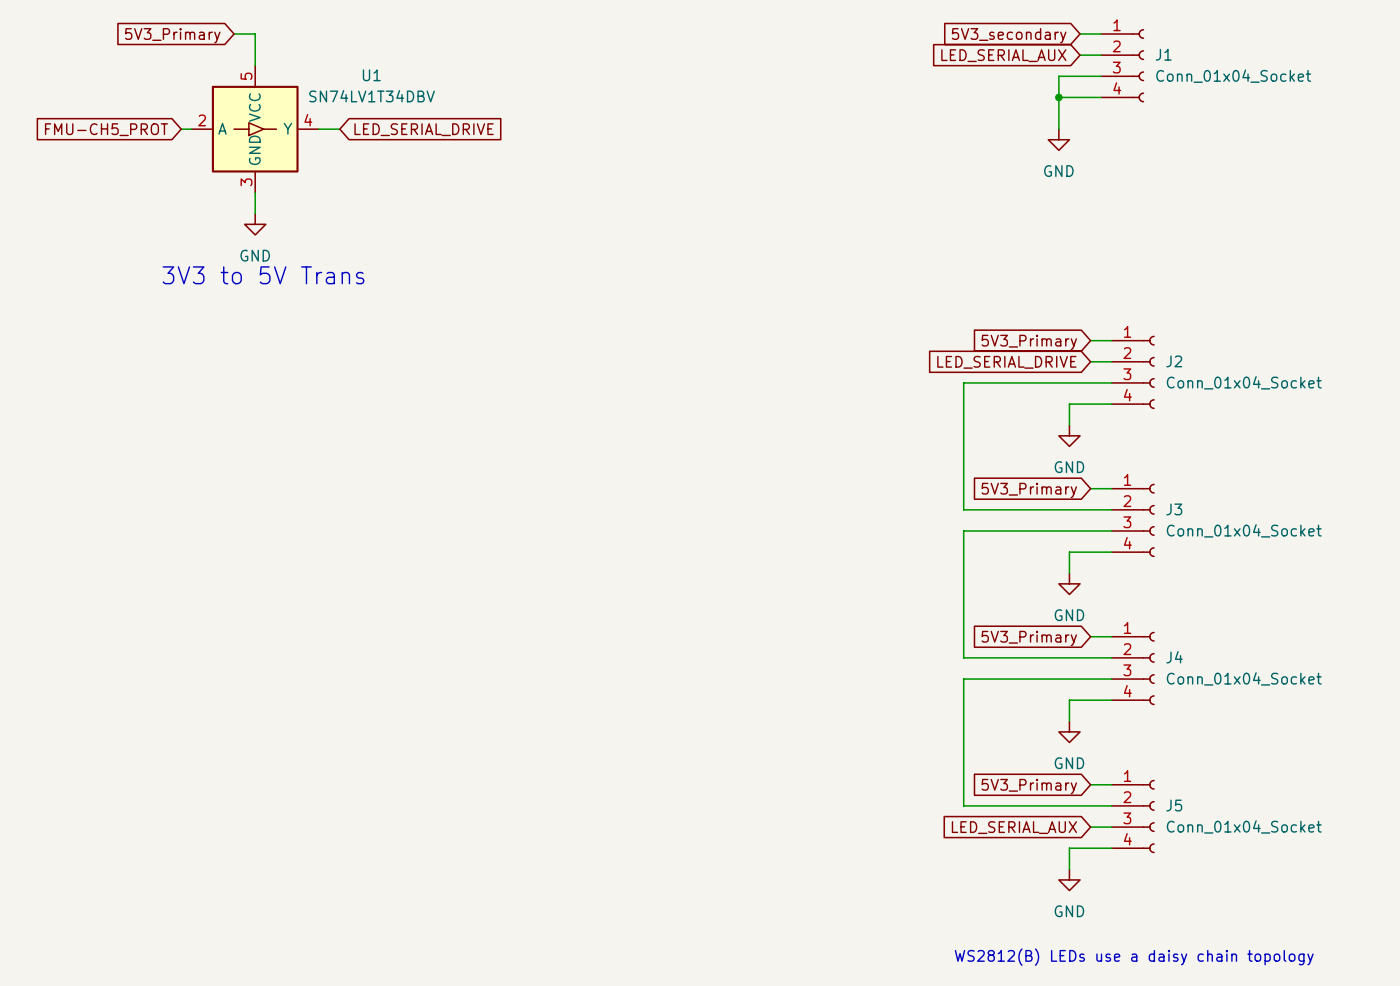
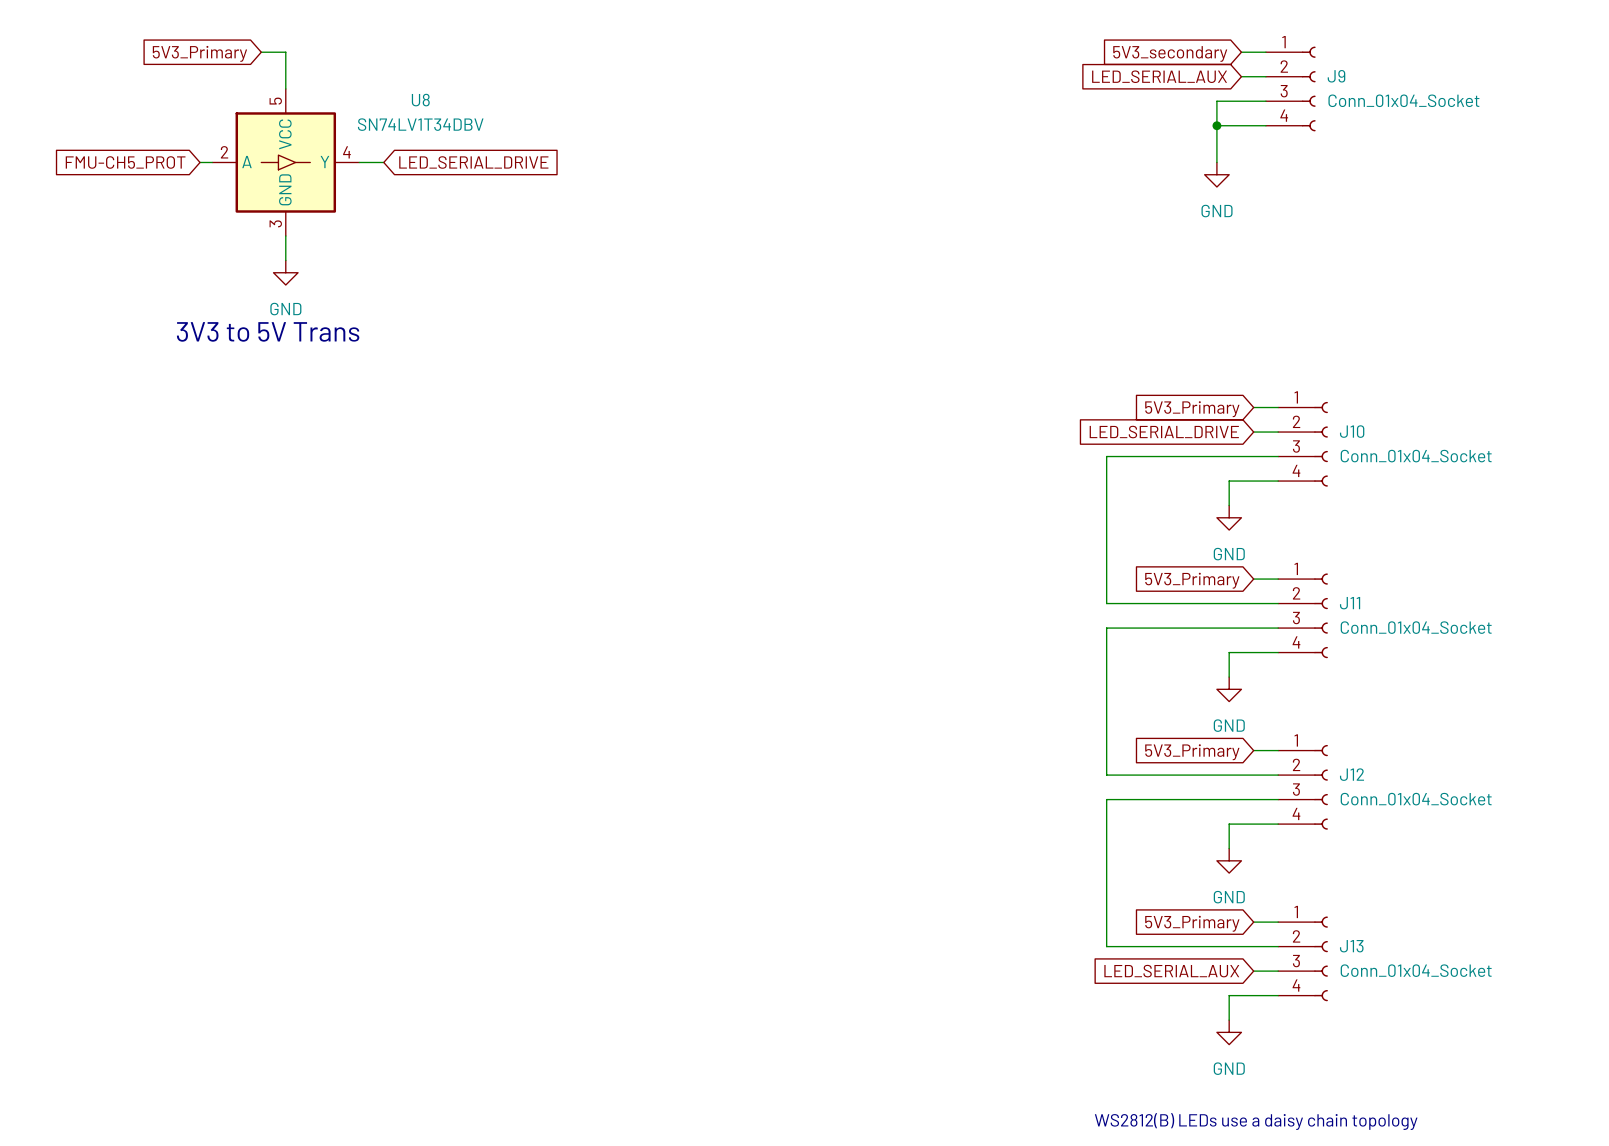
J1 name: J1 (1163, 54) -> J9 (1336, 76)
U1 name: U1 (371, 75) -> U8 (420, 100)
J2 name: J2 (1174, 361) -> J10 (1352, 431)
J3 name: J3 (1174, 509) -> J11 (1350, 603)
J4 name: J4 (1174, 657) -> J12 (1351, 774)
J5 name: J5 (1174, 805) -> J13 (1351, 946)

